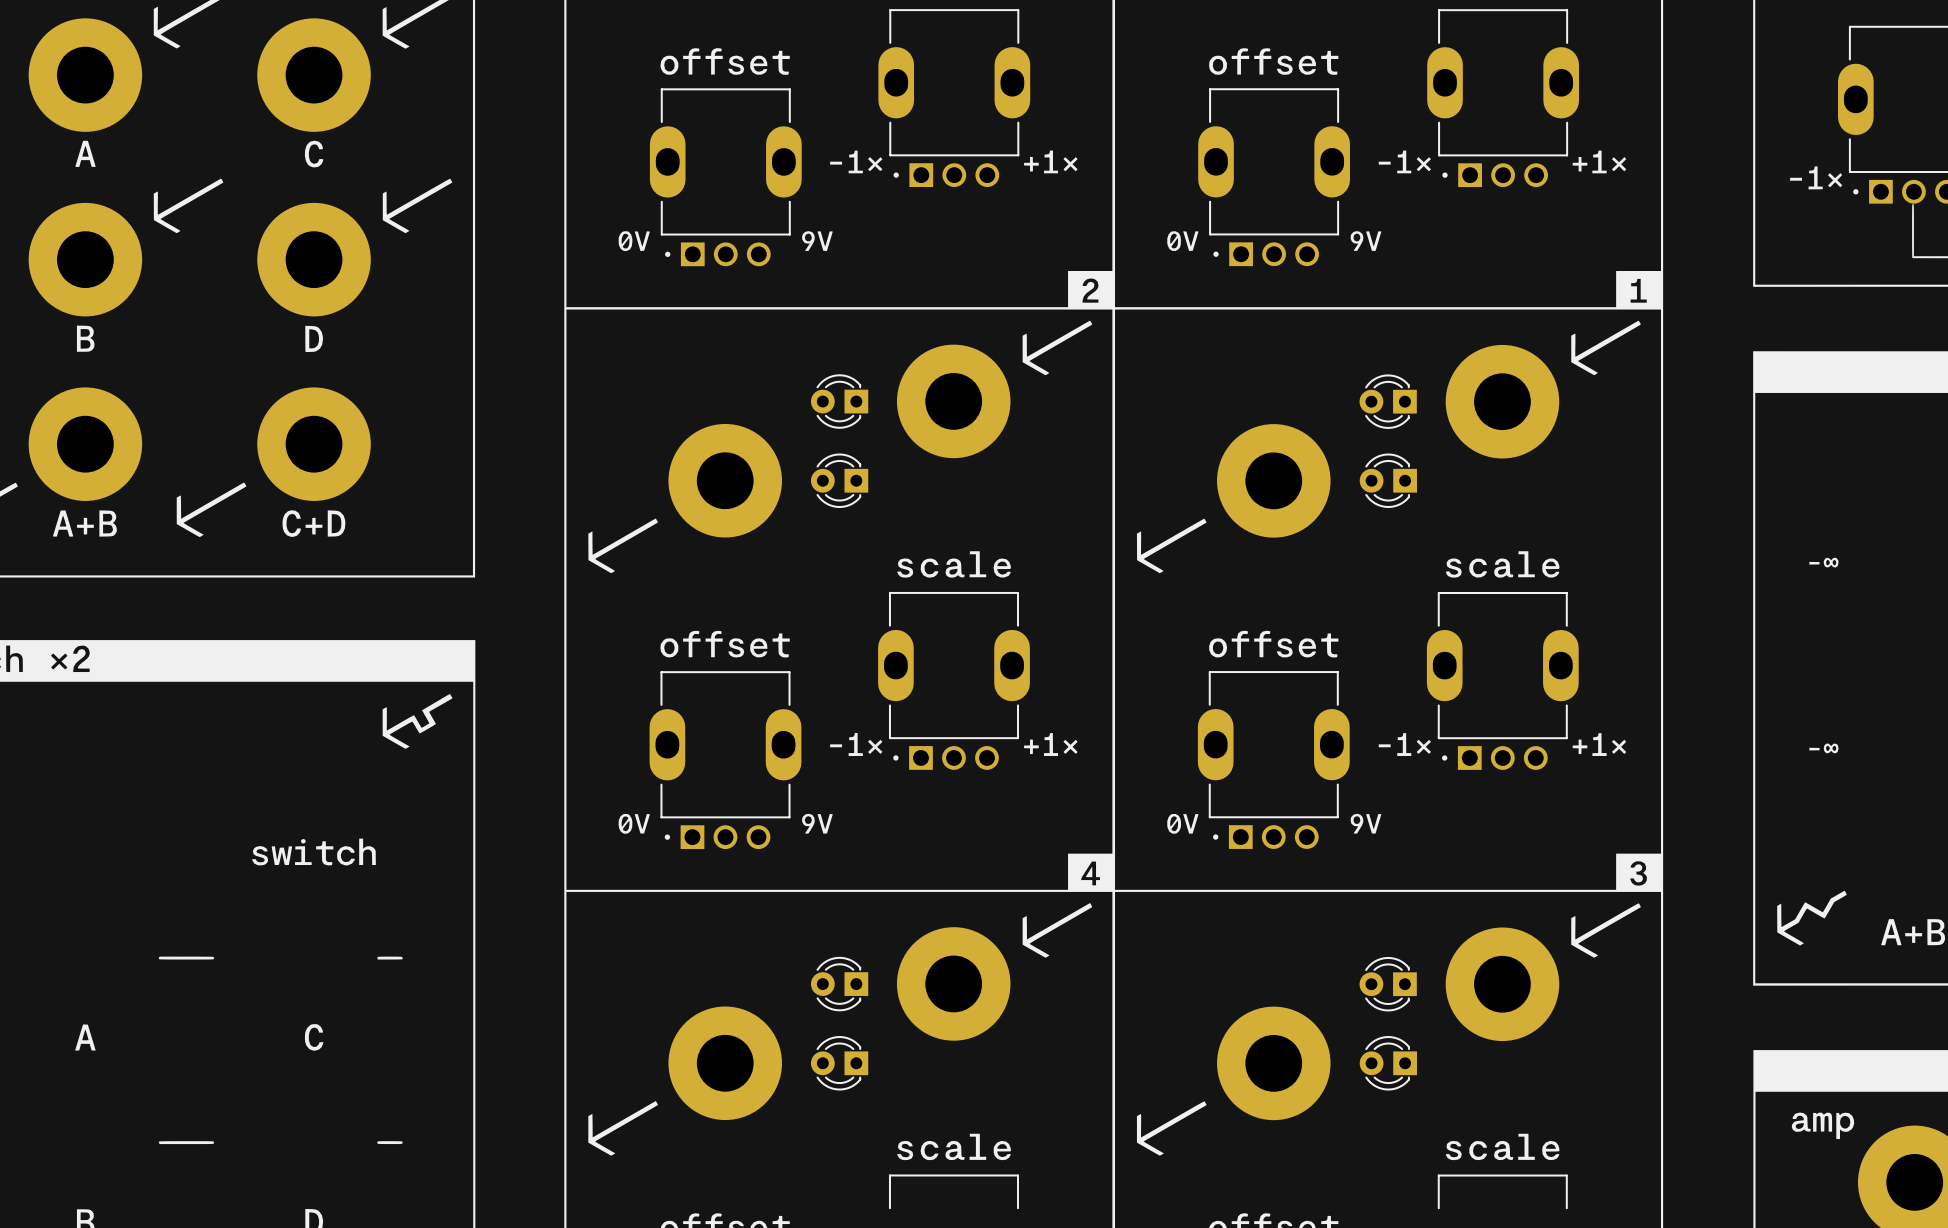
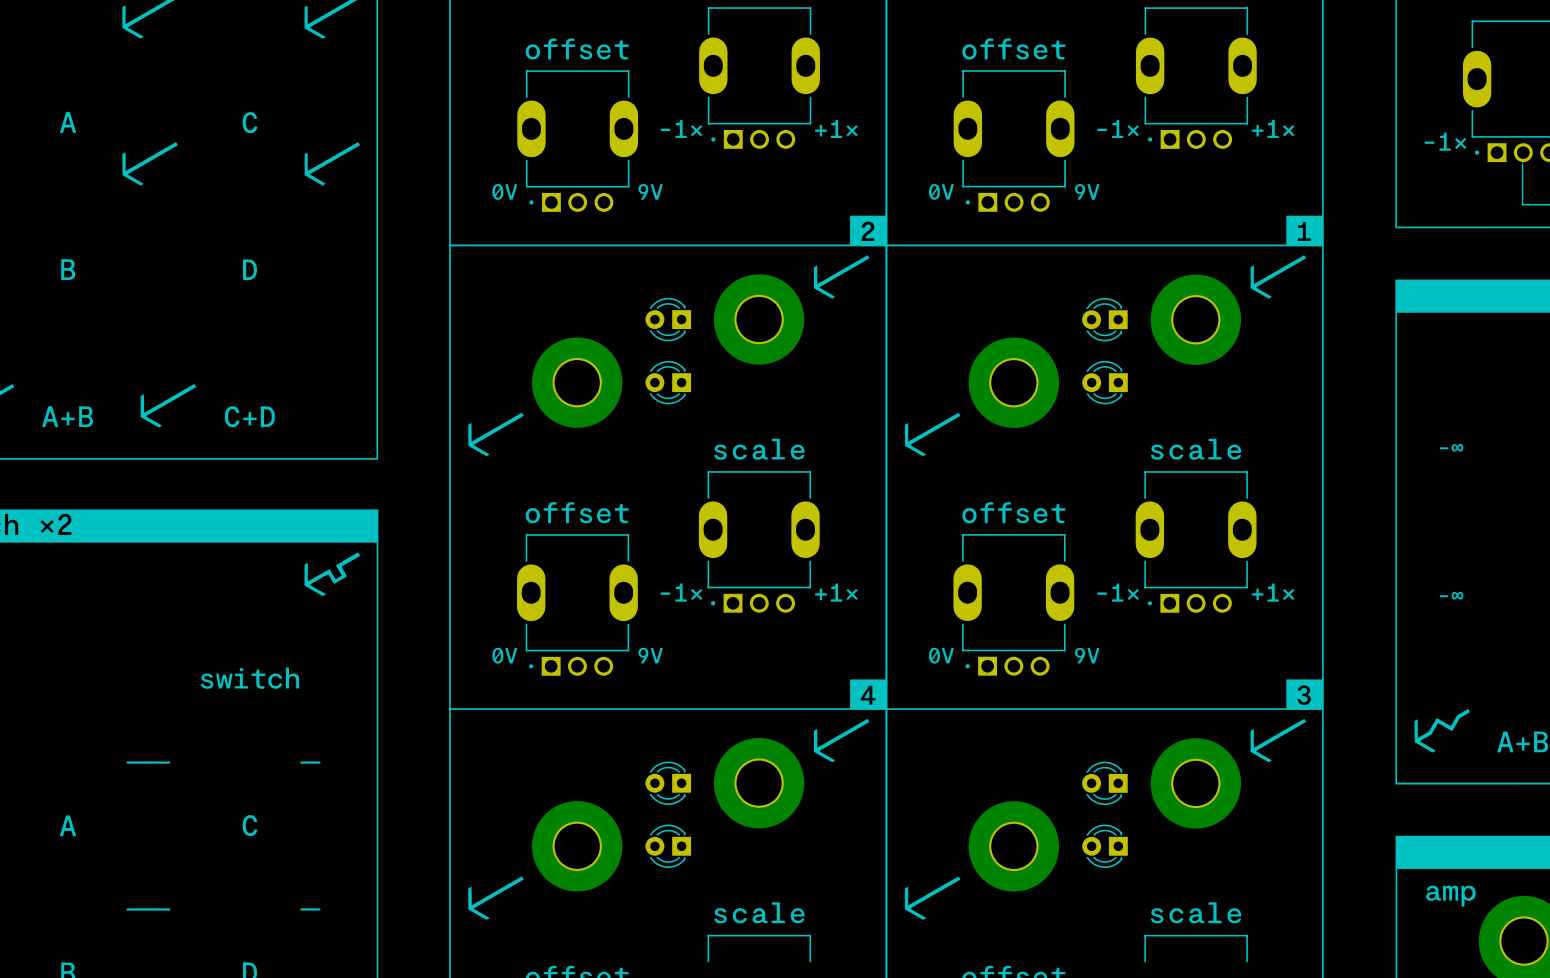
part: (85, 75) -> none
part: (314, 75) -> none
part: (85, 259) -> none
part: (314, 259) -> none
part: (85, 444) -> none
part: (314, 444) -> none

